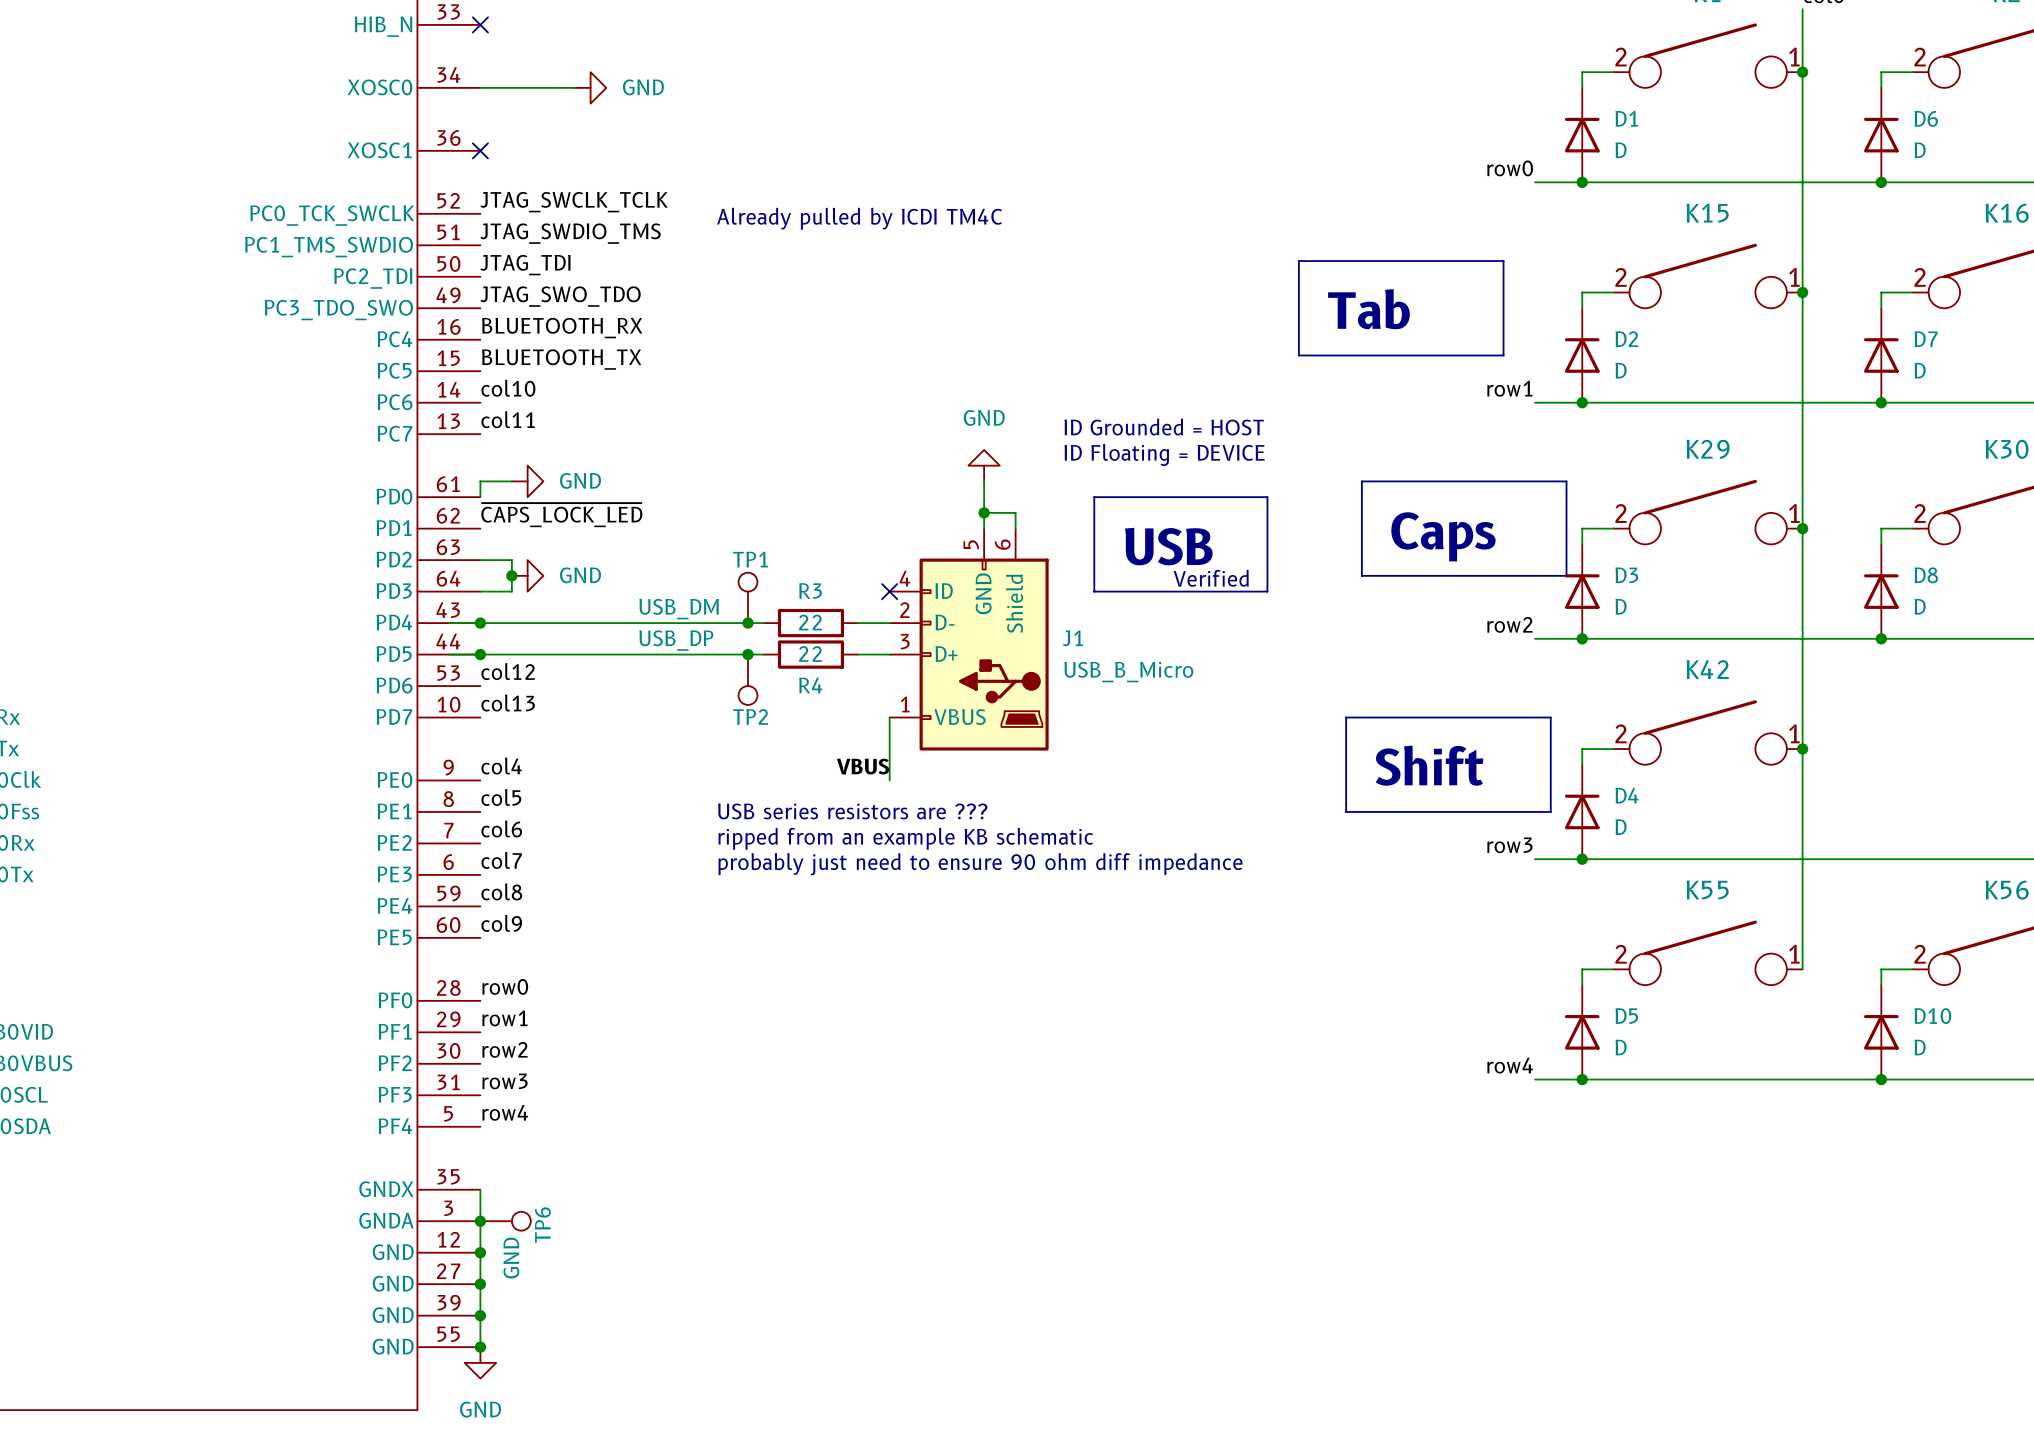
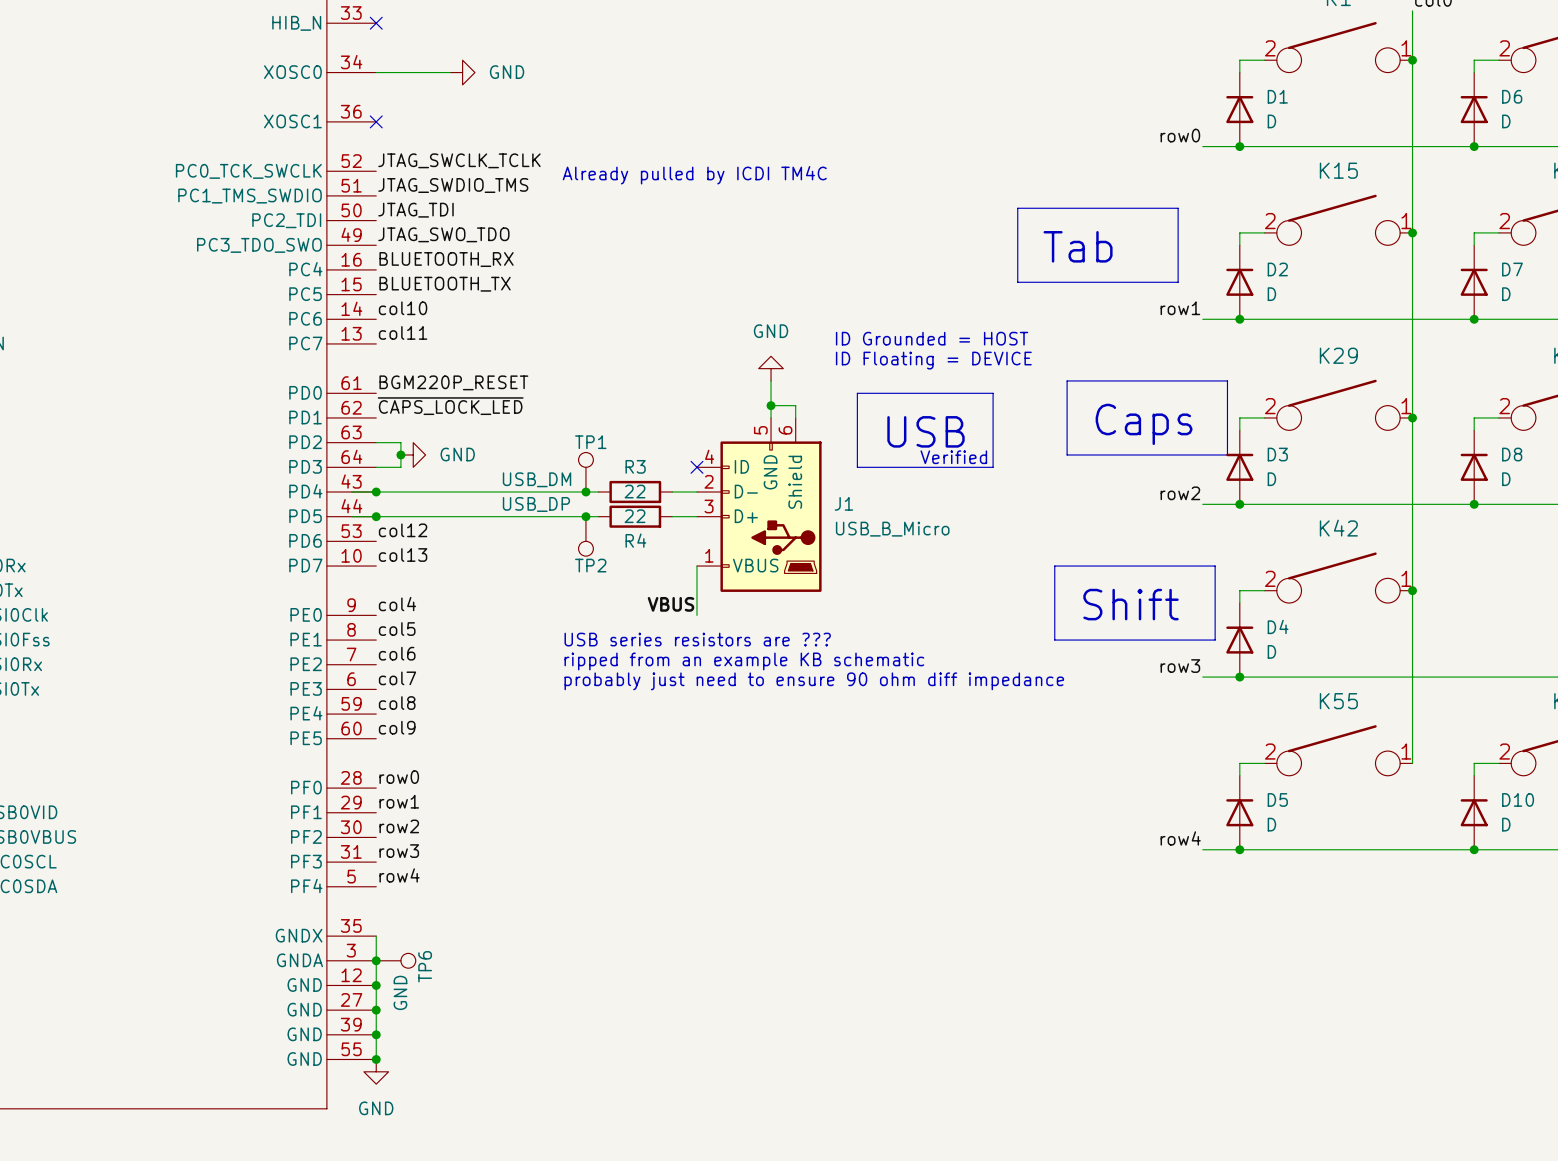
wire: (511, 481) (480, 481) (480, 497) -> none
power symbol: GND (527, 481) -> none
label: none -> BGM220P_RESET (453, 382)

